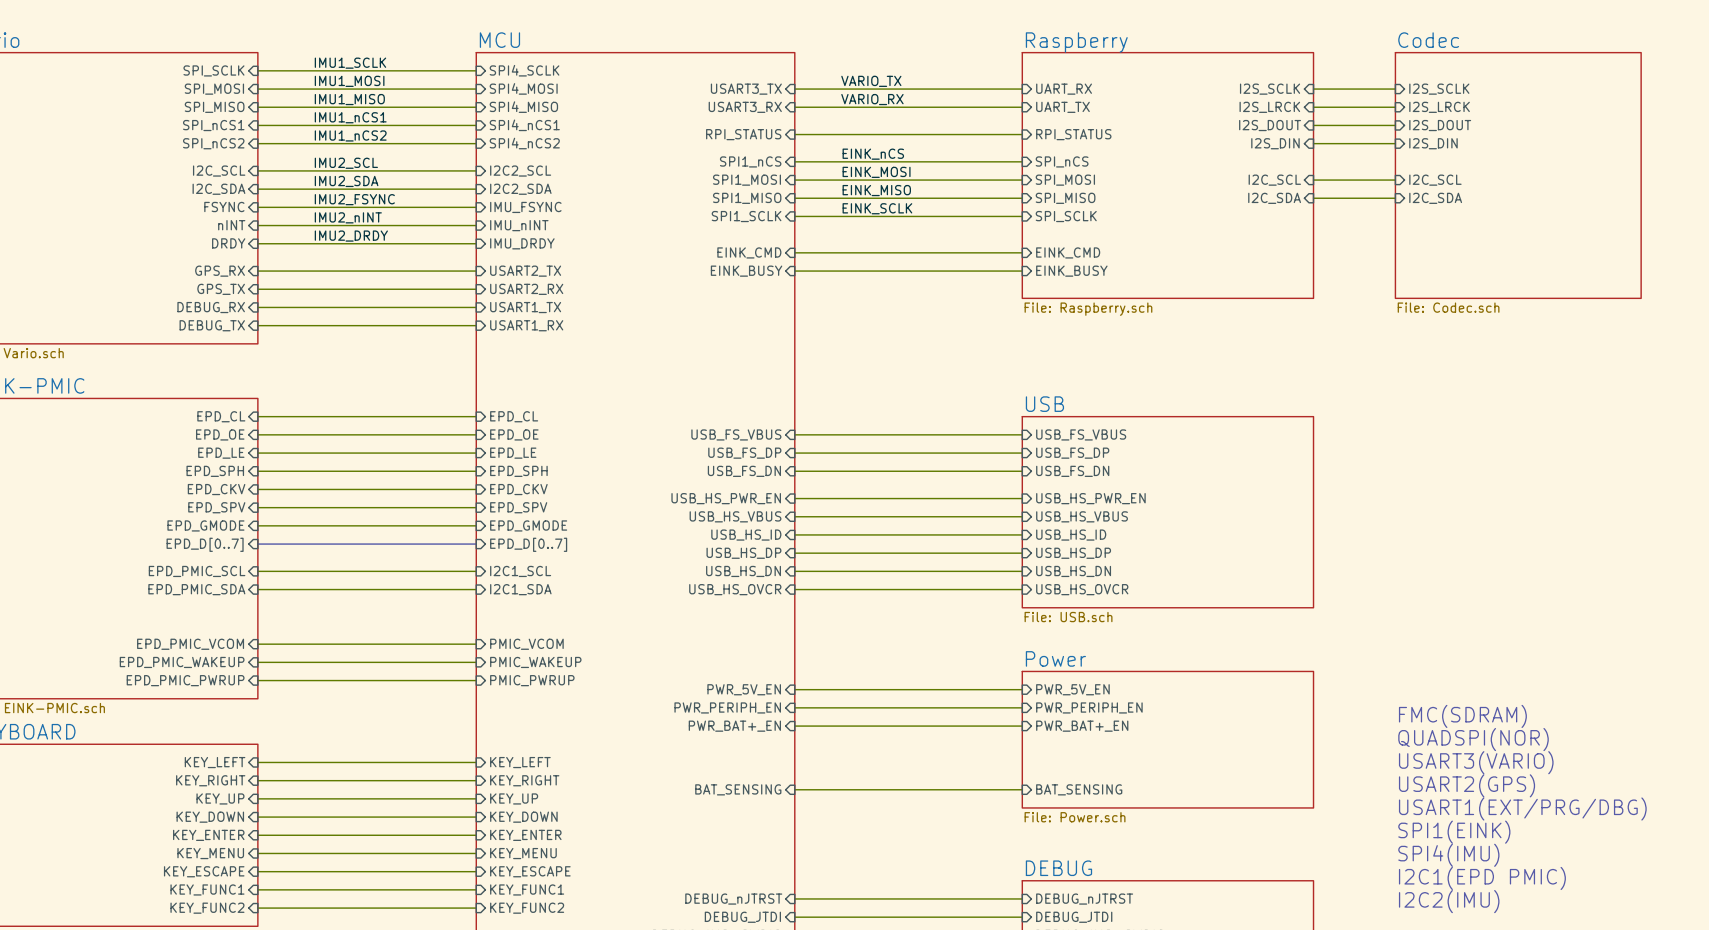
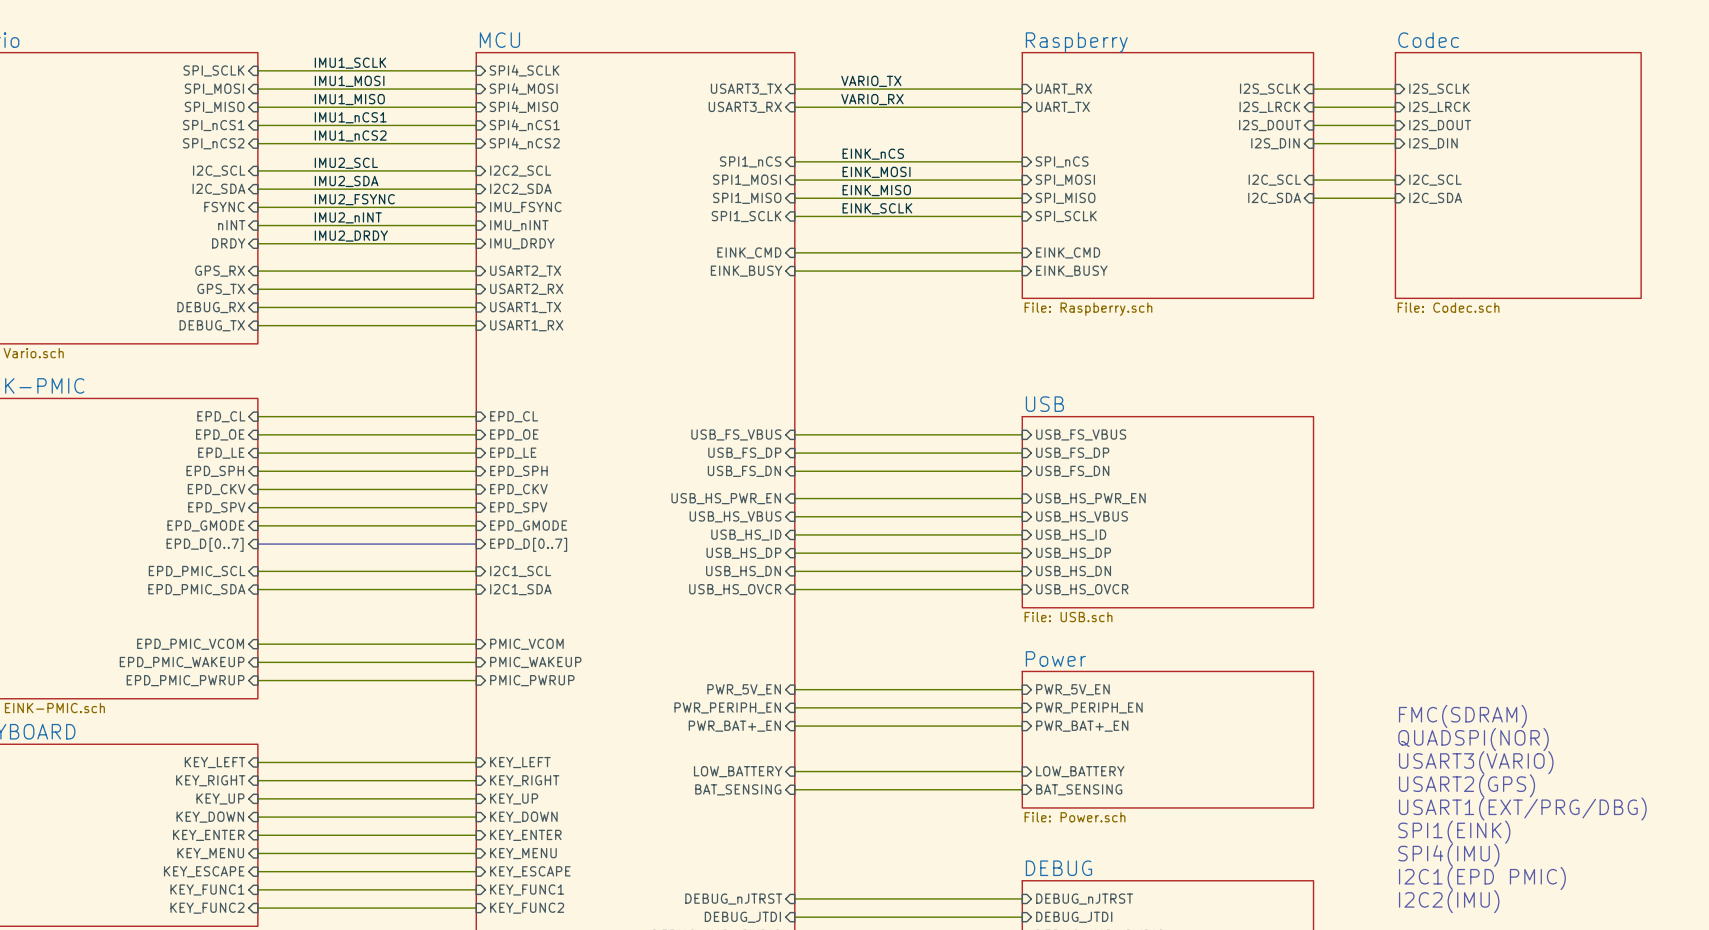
sheet pin: RPI_STATUS (743, 134) -> none
wire: (794, 134) (1022, 134) -> none
sheet pin: RPI_STATUS (1073, 134) -> none
sheet pin: none -> LOW_BATTERY (738, 771)
wire: none -> (794, 771) (1022, 771)
sheet pin: none -> LOW_BATTERY (1080, 771)

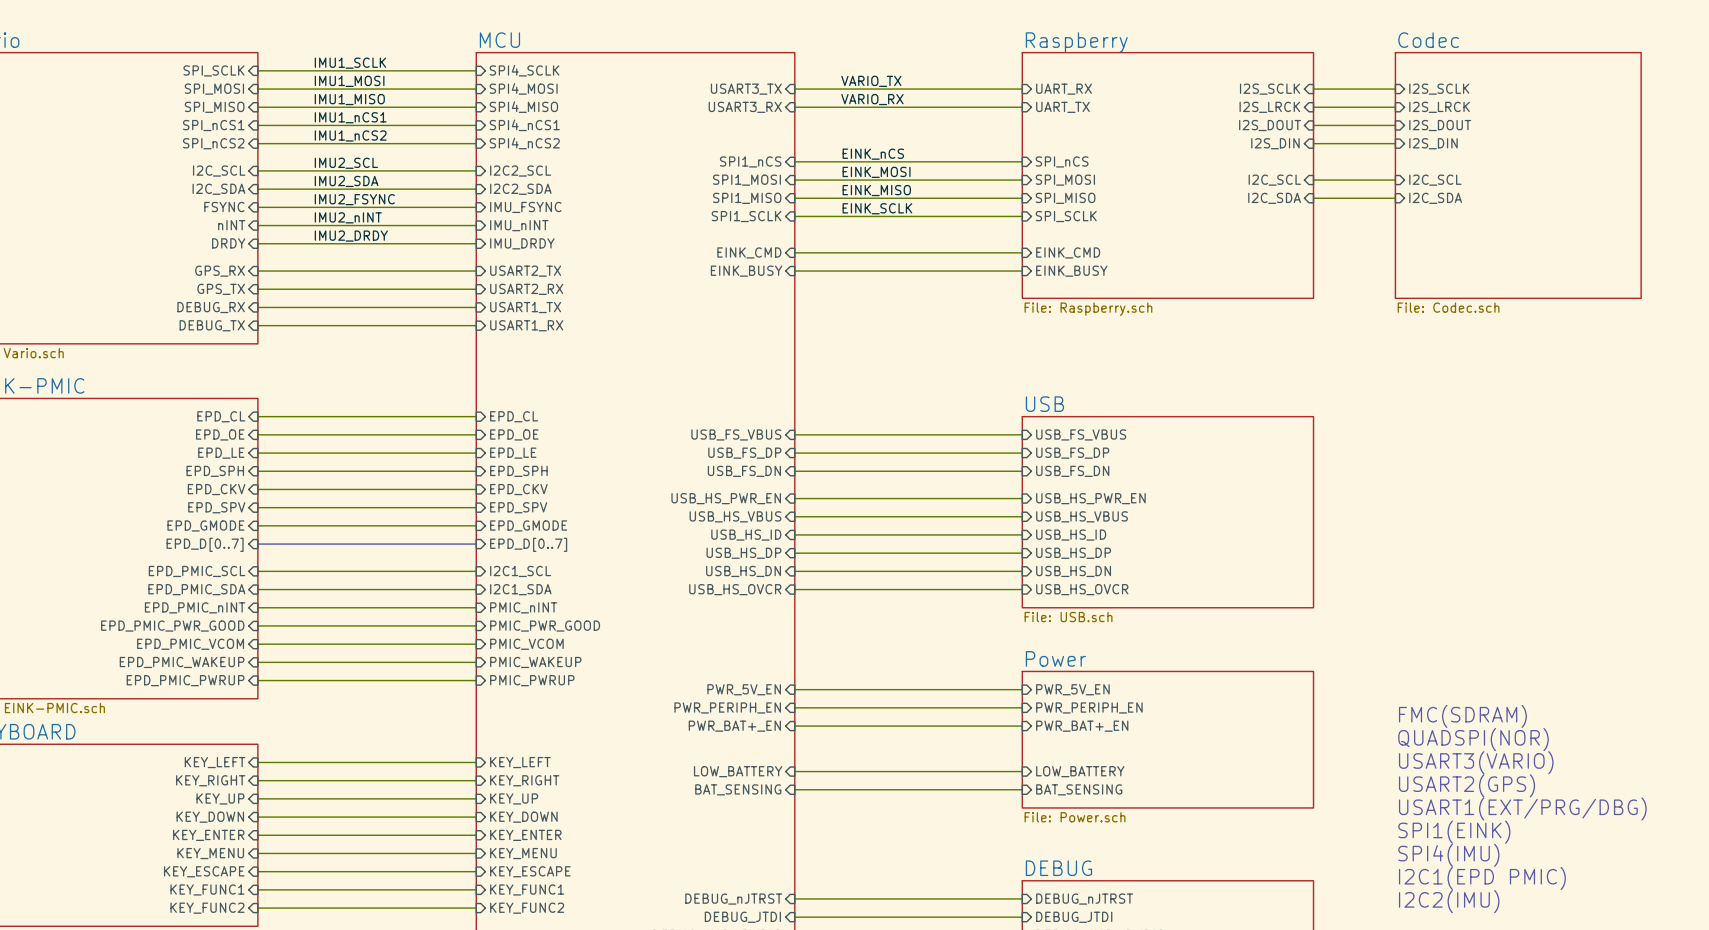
sheet pin: none -> EPD_PMIC_nINT (195, 607)
wire: none -> (257, 607) (476, 607)
sheet pin: none -> PMIC_nINT (523, 607)
wire: none -> (257, 625) (476, 625)
sheet pin: none -> EPD_PMIC_PWR_GOOD (172, 626)
sheet pin: none -> PMIC_PWR_GOOD (545, 626)

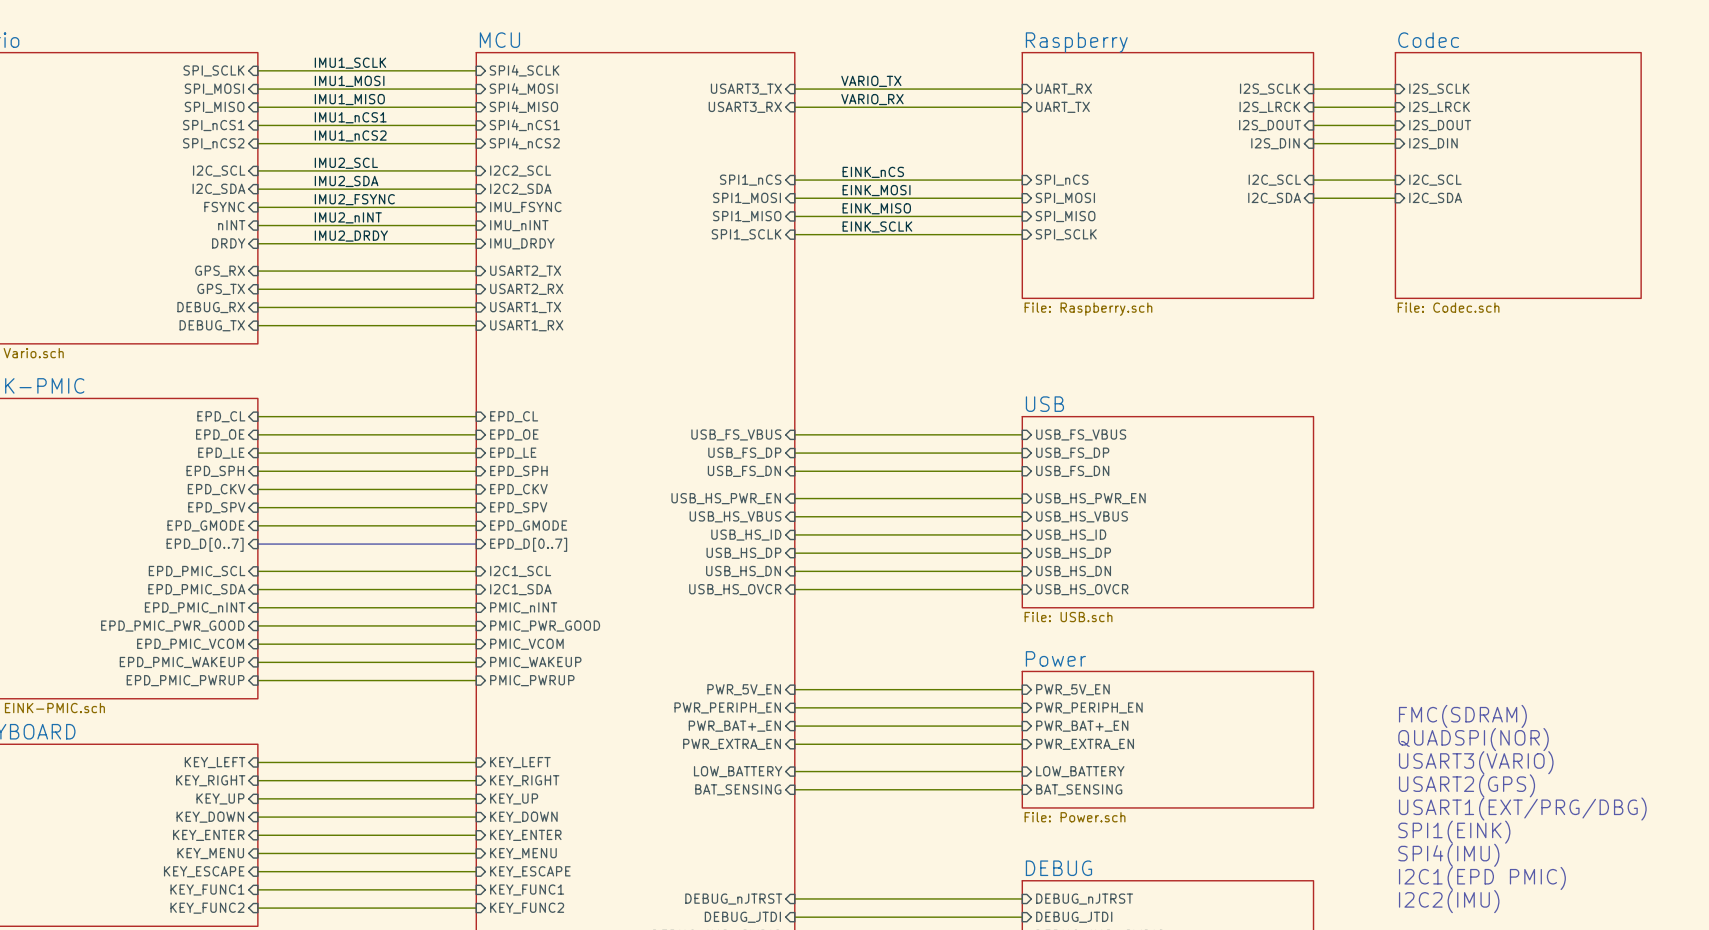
label: EINK_nCS (873, 154) -> none
sheet pin: SPI1_nCS (750, 161) -> none
wire: (794, 161) (1022, 161) -> none
sheet pin: SPI_nCS (1062, 161) -> none
label: EINK_MOSI (876, 172) -> EINK_nCS (873, 172)
sheet pin: SPI1_MOSI (746, 180) -> SPI1_nCS (750, 180)
sheet pin: SPI_MOSI (1065, 180) -> SPI_nCS (1062, 180)
label: EINK_MISO (876, 190) -> EINK_MOSI (876, 190)
sheet pin: SPI1_MISO (747, 198) -> SPI1_MOSI (746, 198)
sheet pin: SPI_MISO (1065, 198) -> SPI_MOSI (1065, 198)
label: EINK_SCLK (877, 208) -> EINK_MISO (876, 208)
sheet pin: SPI1_SCLK (746, 216) -> SPI1_MISO (747, 216)
sheet pin: SPI_SCLK (1066, 216) -> SPI_MISO (1065, 216)
label: none -> EINK_SCLK (877, 226)
sheet pin: none -> SPI1_SCLK (746, 234)
sheet pin: none -> SPI_SCLK (1066, 234)
sheet pin: EINK_CMD (749, 252) -> none
wire: (794, 252) (1022, 252) -> (794, 234) (1022, 234)
sheet pin: EINK_CMD (1068, 252) -> none
sheet pin: EINK_BUSY (746, 271) -> none
wire: (794, 271) (1022, 271) -> none
sheet pin: EINK_BUSY (1071, 271) -> none
sheet pin: none -> PWR_EXTRA_EN (732, 744)
wire: none -> (794, 744) (1022, 744)
sheet pin: none -> PWR_EXTRA_EN (1085, 744)

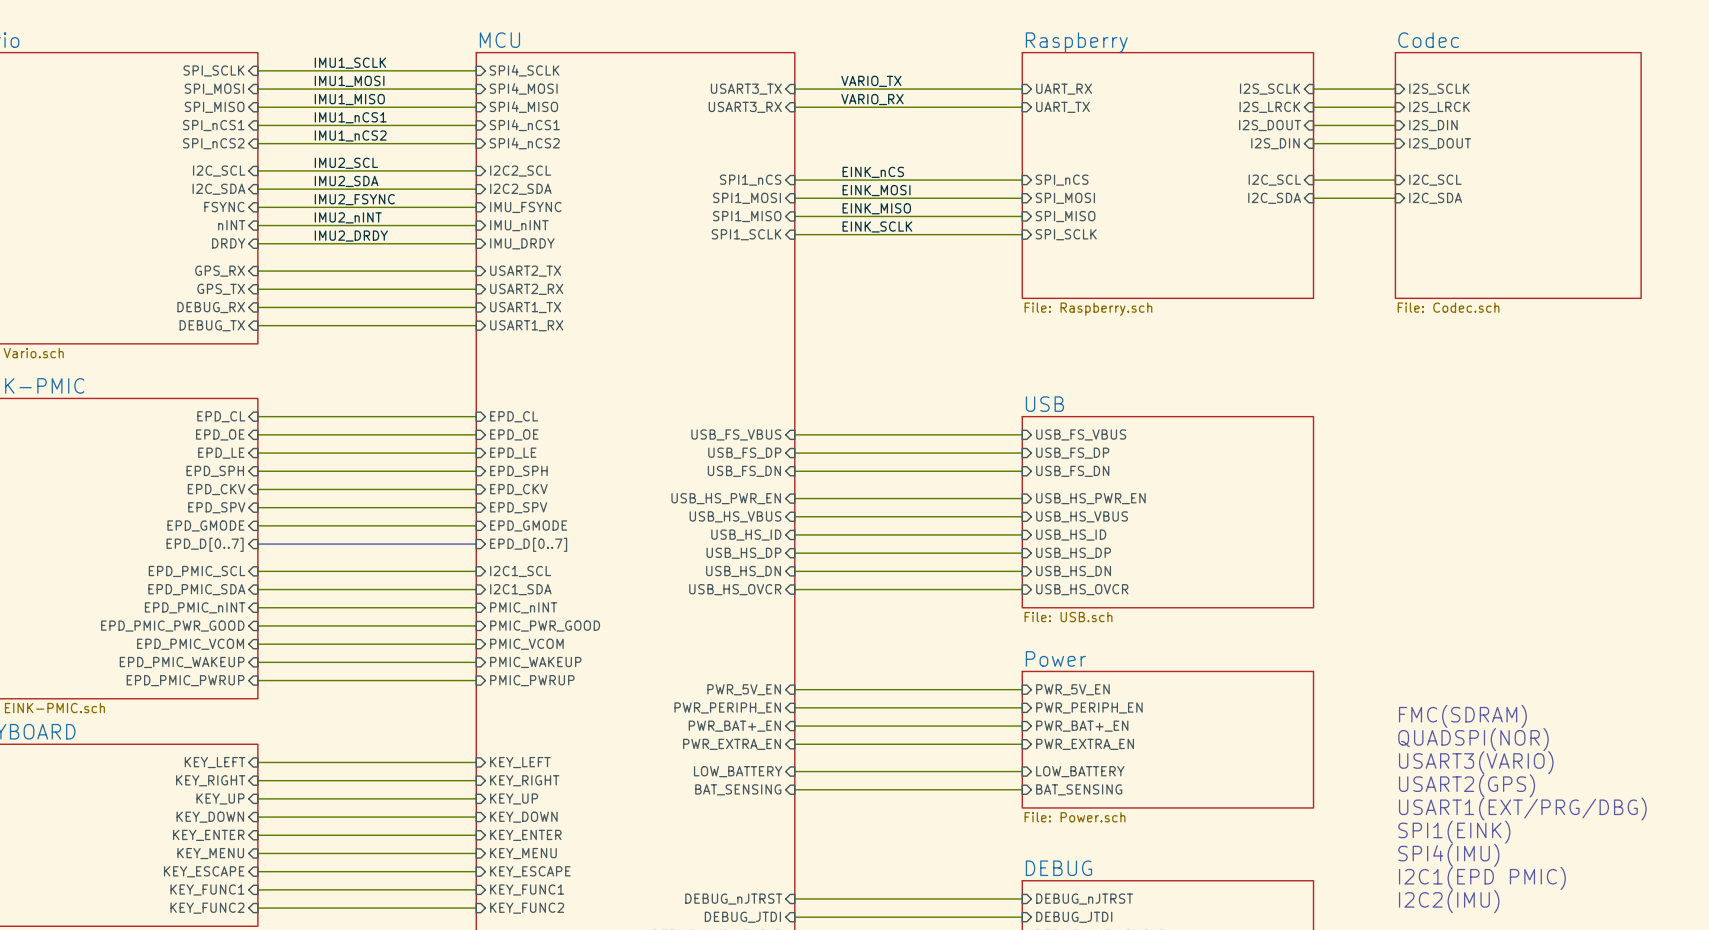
sheet pin: I2S_DOUT (1440, 125) -> I2S_DIN (1433, 125)
sheet pin: I2S_DIN (1433, 143) -> I2S_DOUT (1440, 143)

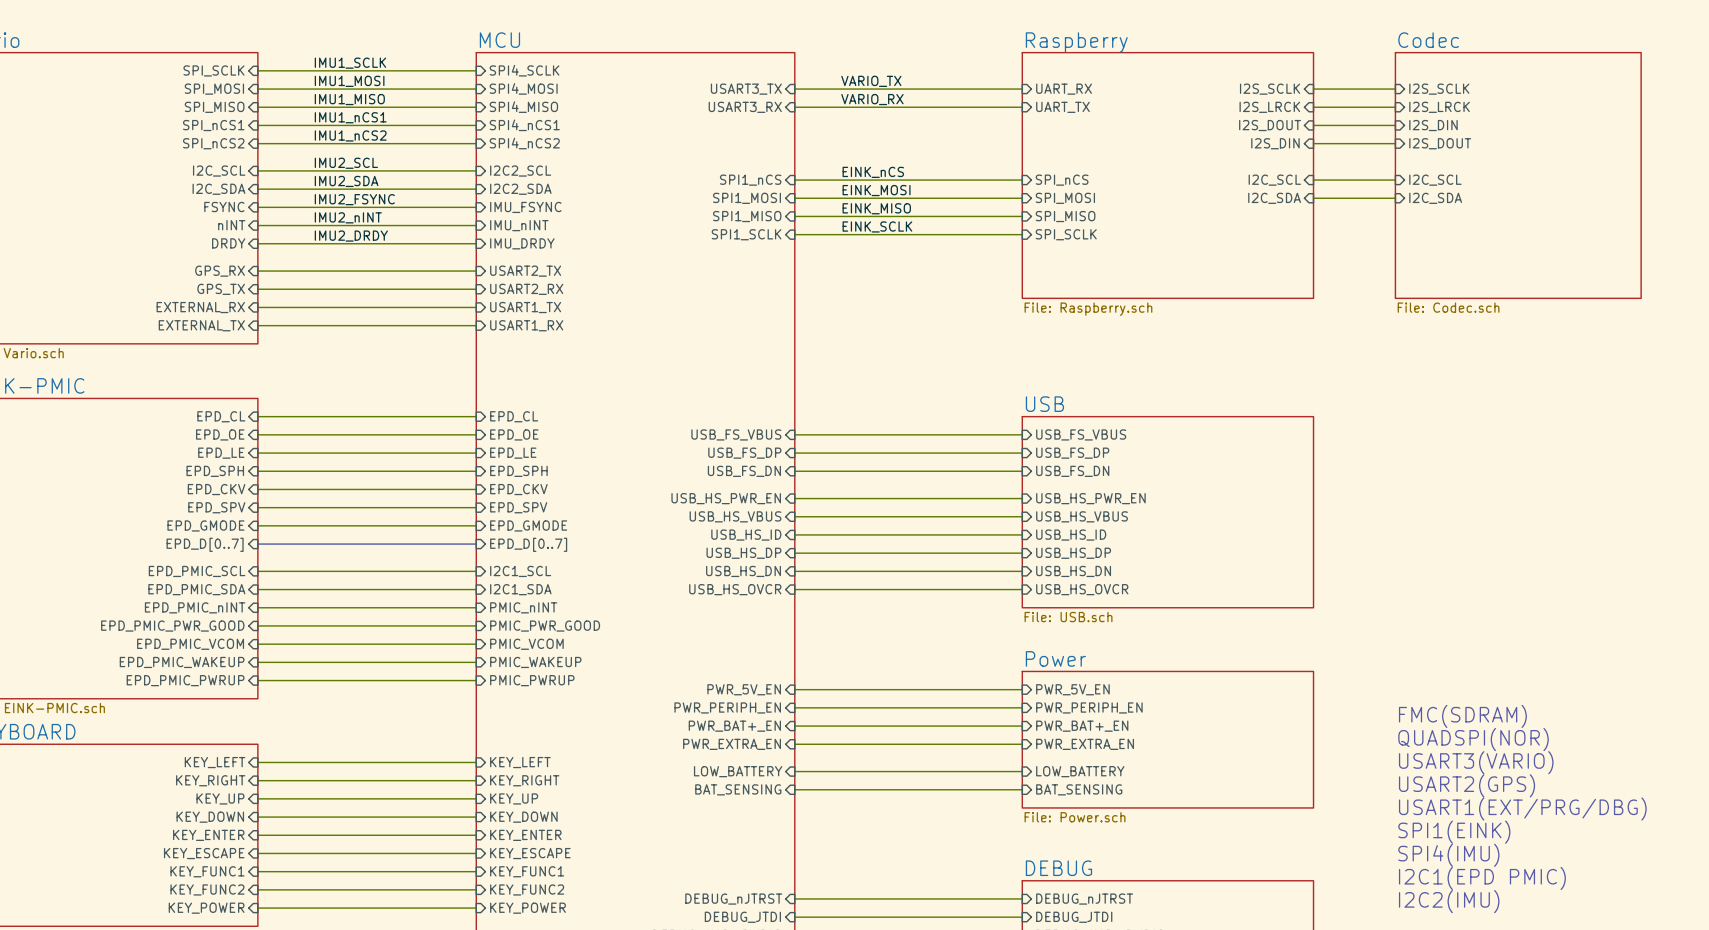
sheet pin: DEBUG_RX (211, 307) -> EXTERNAL_RX (200, 307)
sheet pin: DEBUG_TX (212, 325) -> EXTERNAL_TX (201, 325)
sheet pin: KEY_MENU (210, 853) -> KEY_ESCAPE (204, 853)
sheet pin: KEY_MENU (523, 853) -> KEY_ESCAPE (530, 853)
sheet pin: KEY_ESCAPE (204, 871) -> KEY_FUNC1 (207, 871)
sheet pin: KEY_ESCAPE (530, 871) -> KEY_FUNC1 (527, 871)
sheet pin: KEY_FUNC1 (207, 889) -> KEY_FUNC2 (207, 889)
sheet pin: KEY_FUNC1 (527, 889) -> KEY_FUNC2 (527, 889)
sheet pin: KEY_FUNC2 (207, 908) -> KEY_POWER (206, 908)
sheet pin: KEY_FUNC2 (527, 908) -> KEY_POWER (527, 908)

